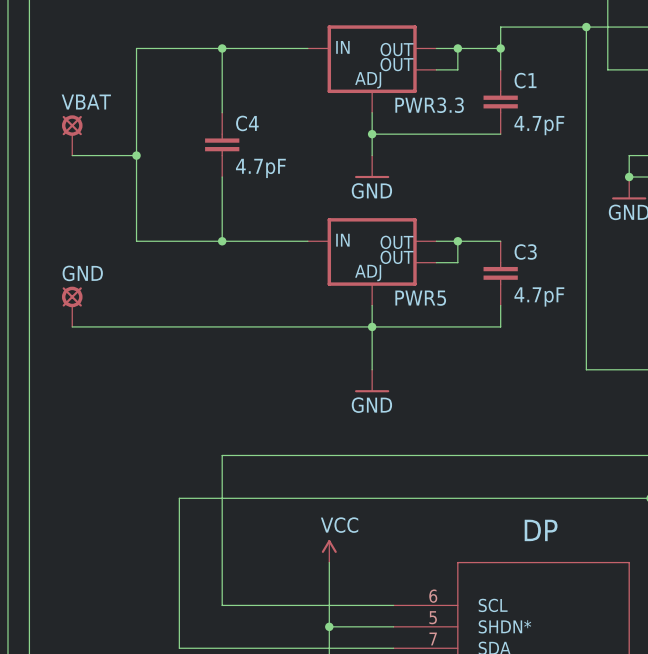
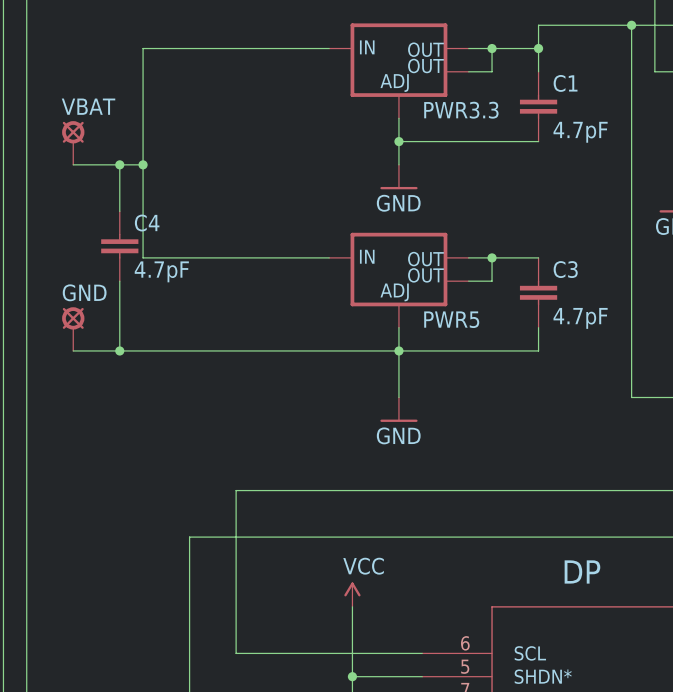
wire: (222, 48) (222, 112) -> none
junction: (222, 48) -> none
C4 position: (222, 144) -> (119, 246)
wire: none -> (119, 164) (119, 211)
junction: none -> (119, 164)
wire: (222, 177) (222, 241) -> (119, 281) (119, 350)
junction: (222, 241) -> none
junction: none -> (119, 350)

